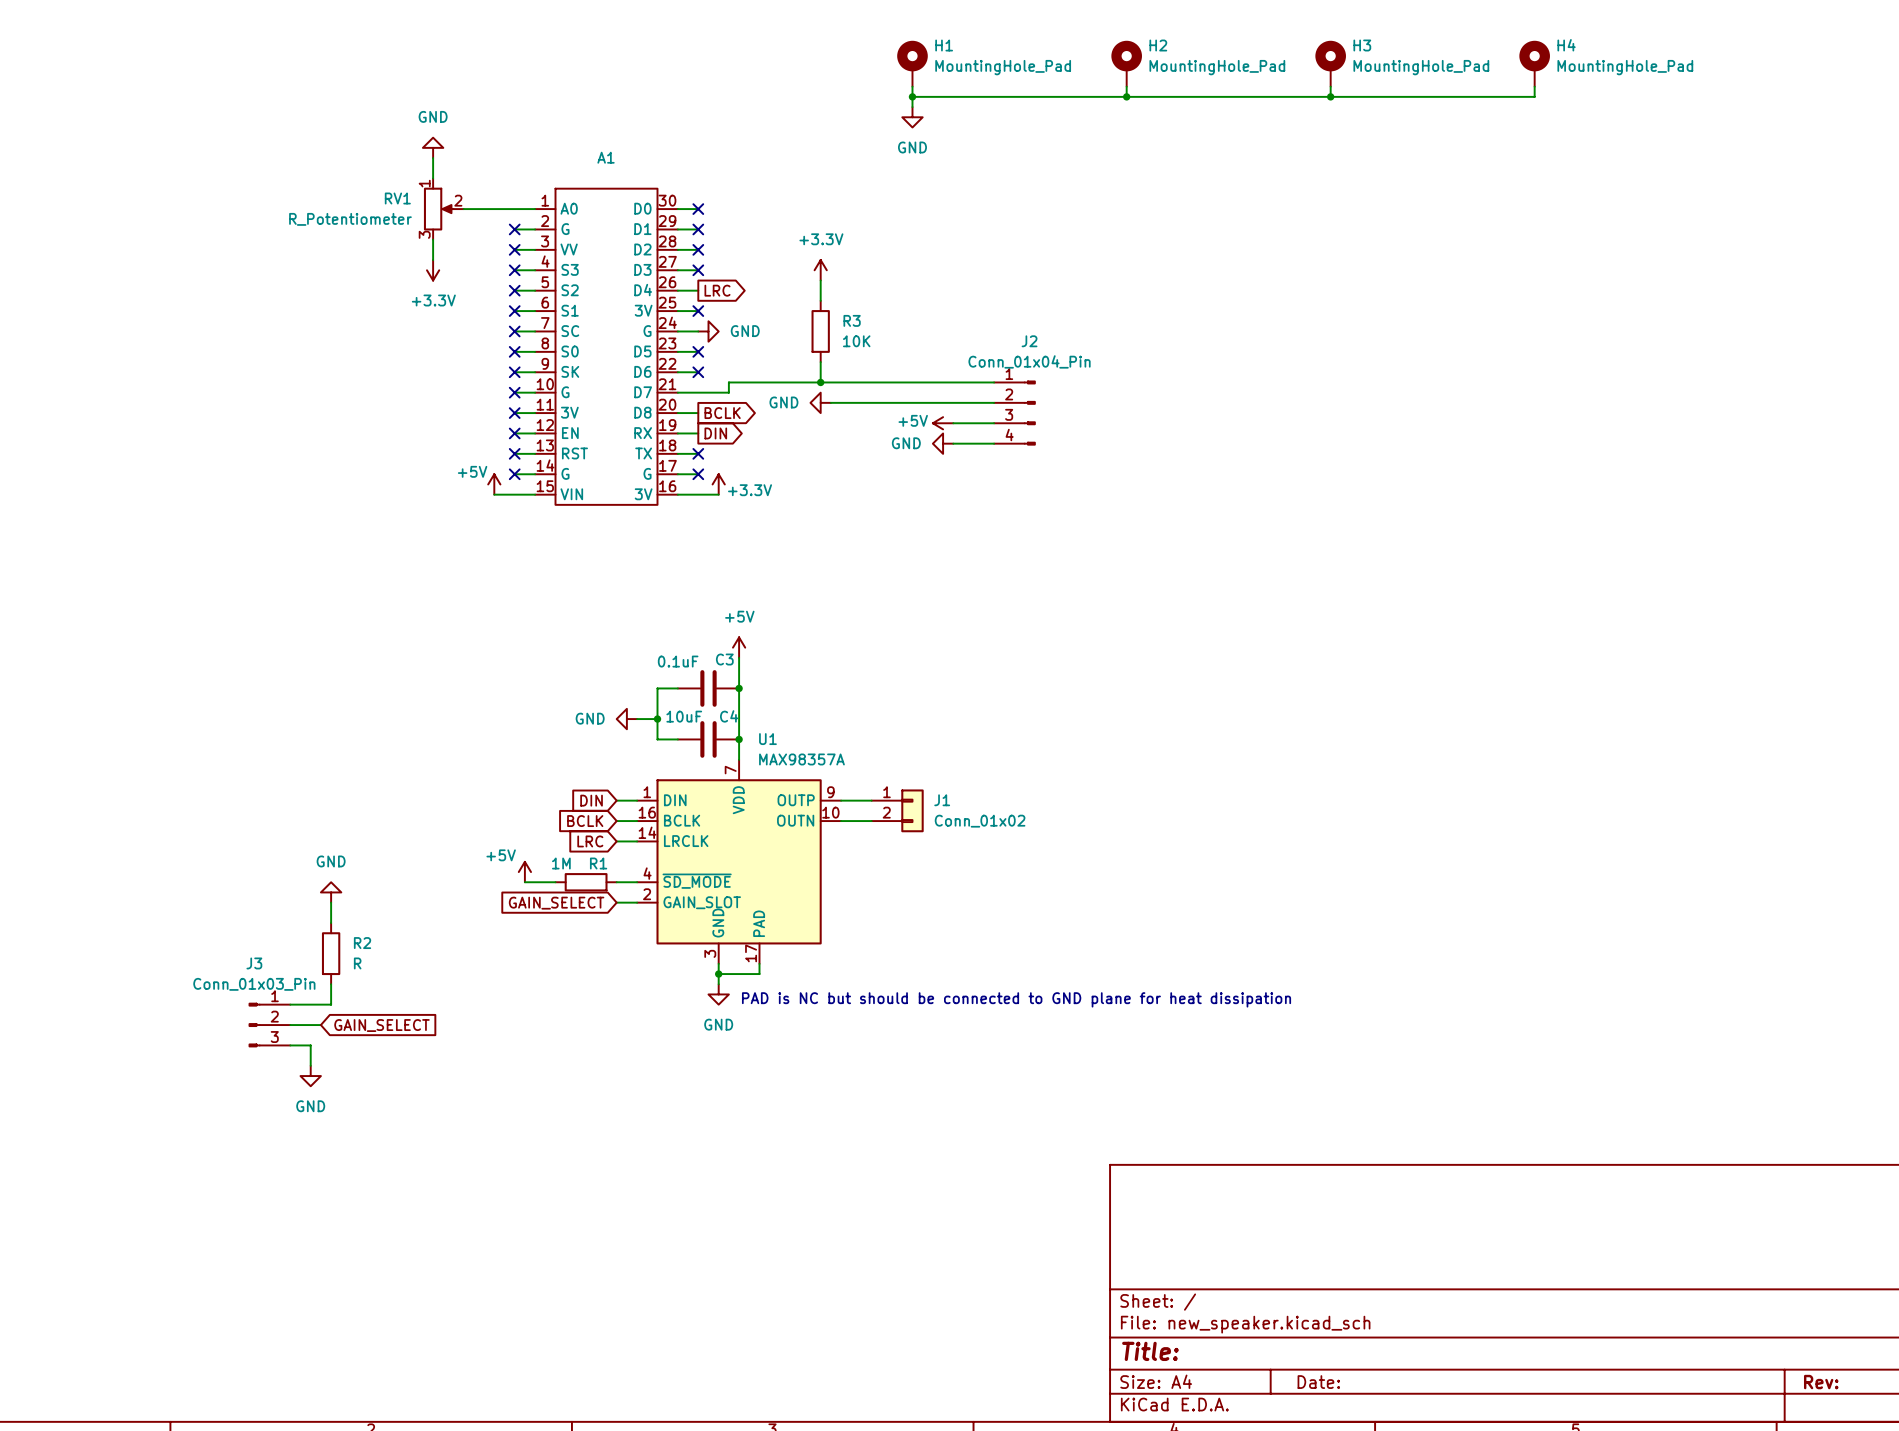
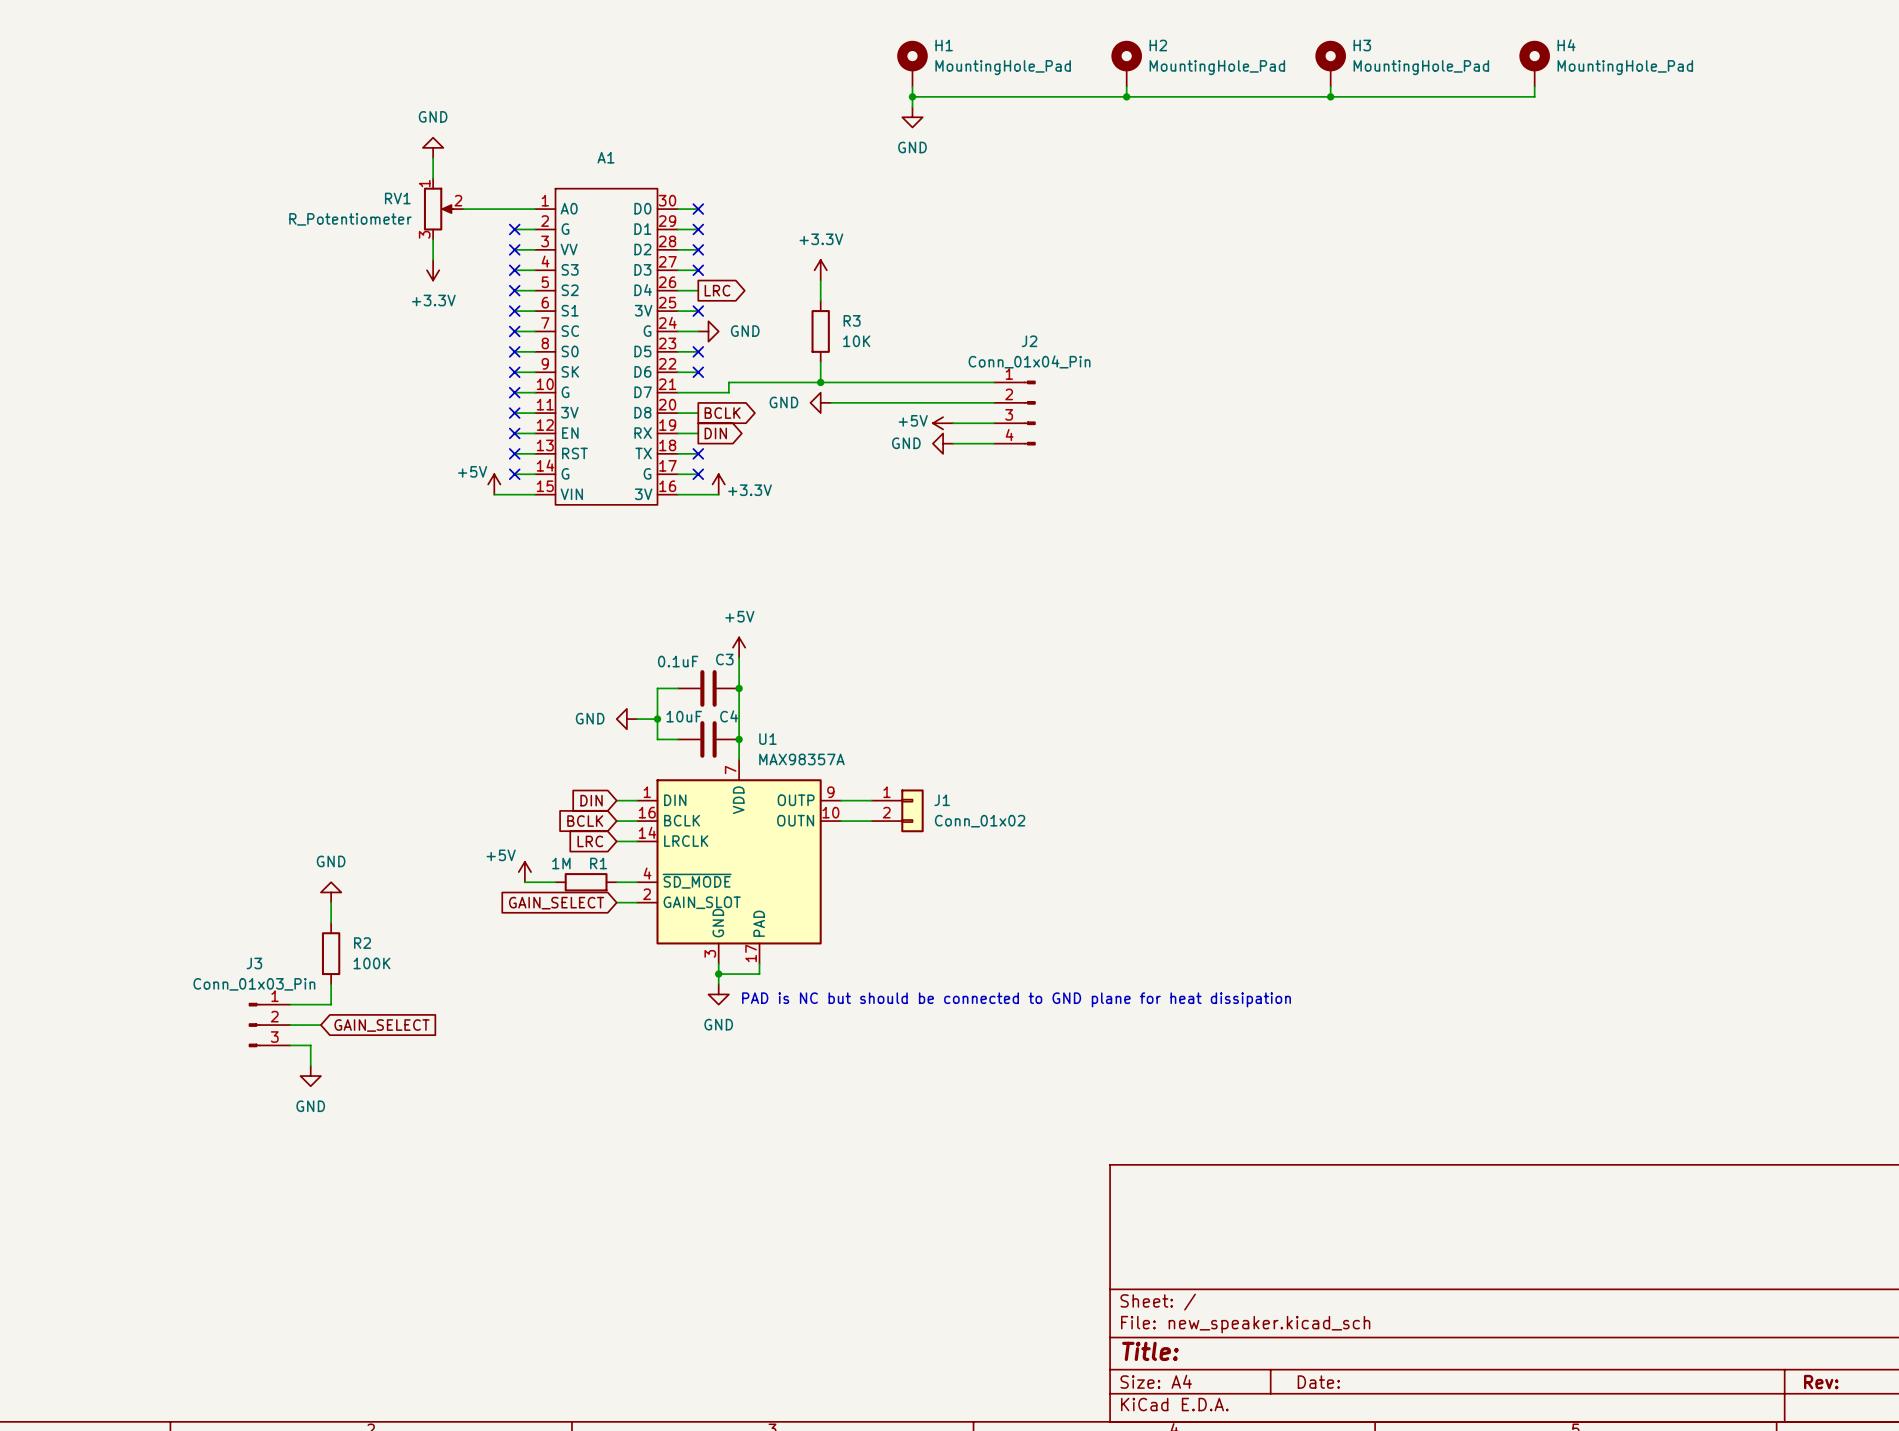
R2 value: R (357, 963) -> 100K (371, 963)

